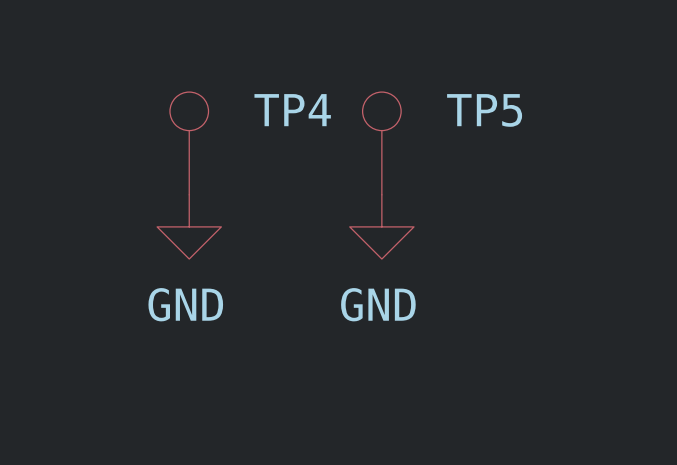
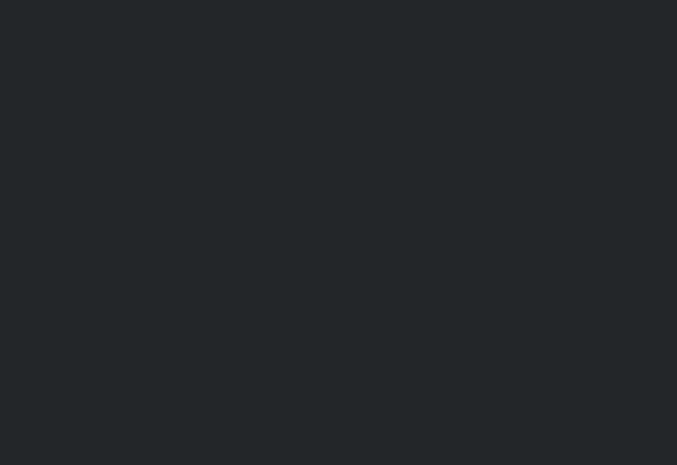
TP4: (189, 143) -> none
TP5: (381, 143) -> none
power symbol: GND (189, 226) -> none
power symbol: GND (381, 226) -> none

